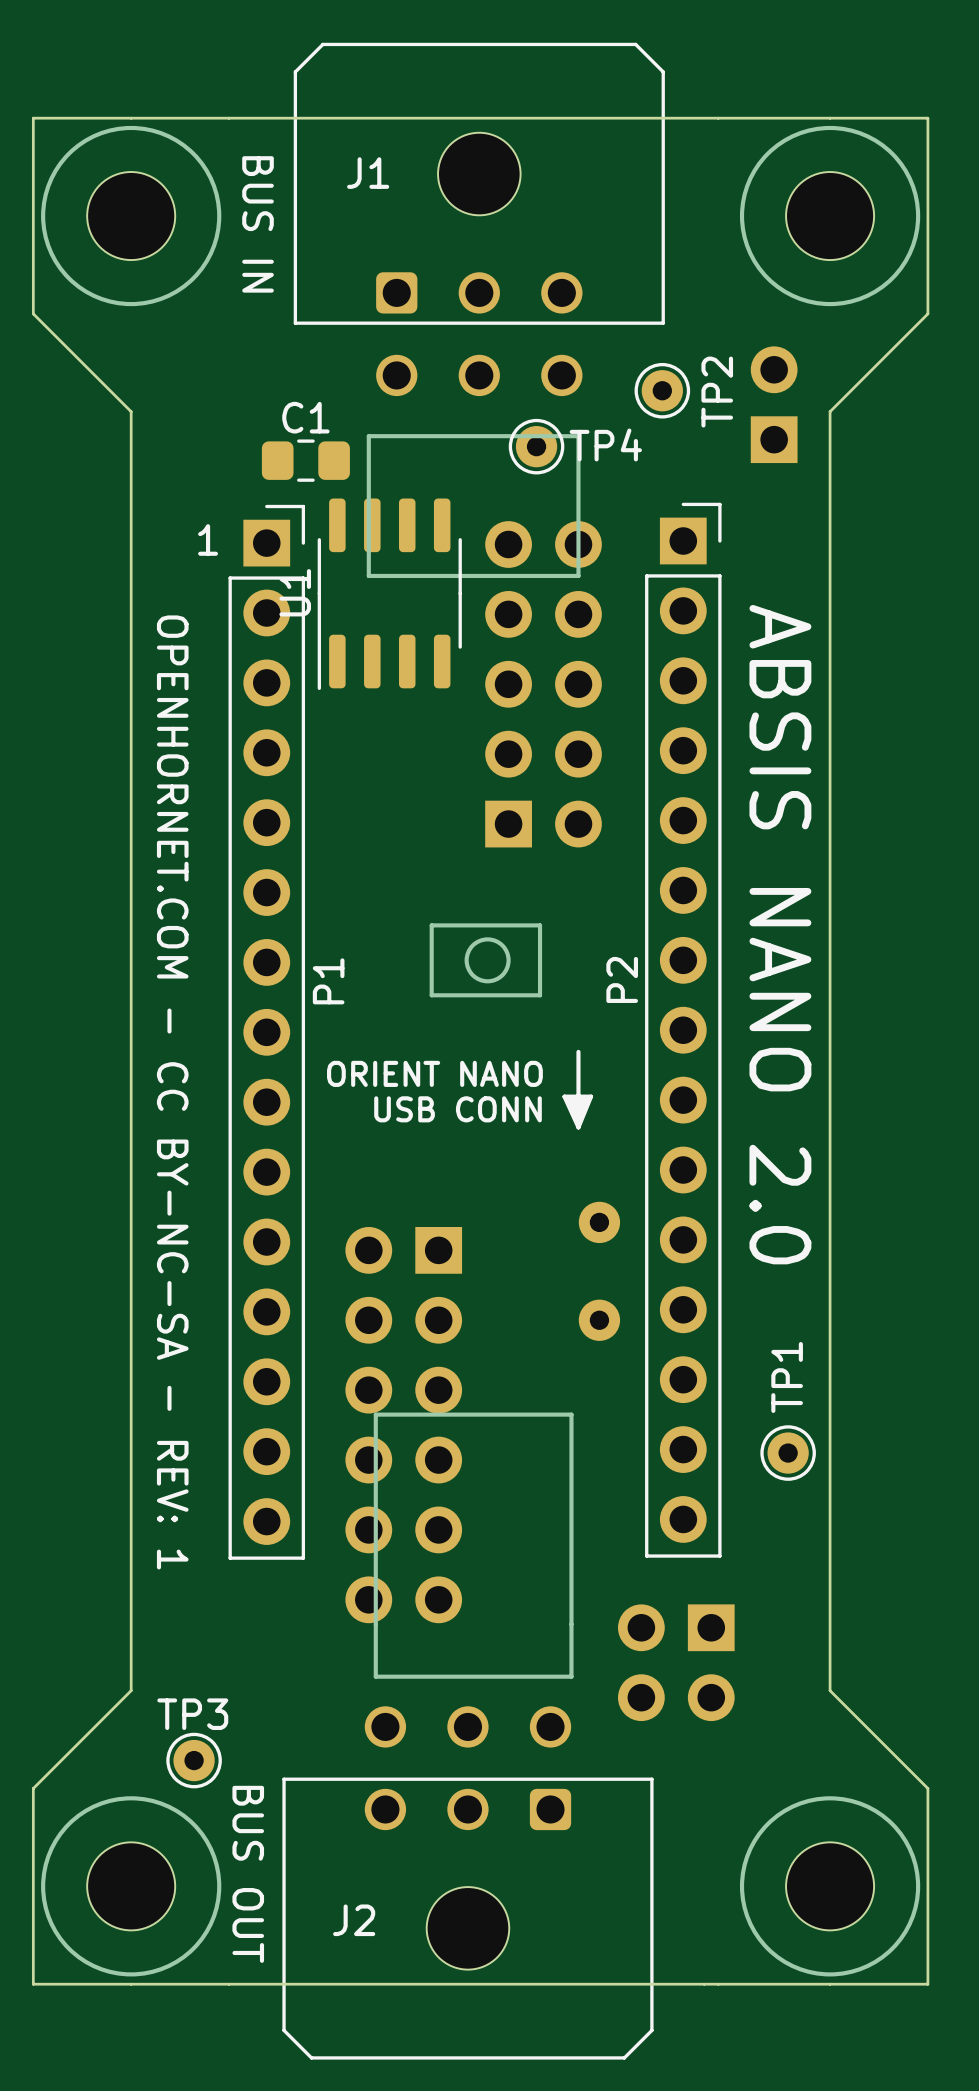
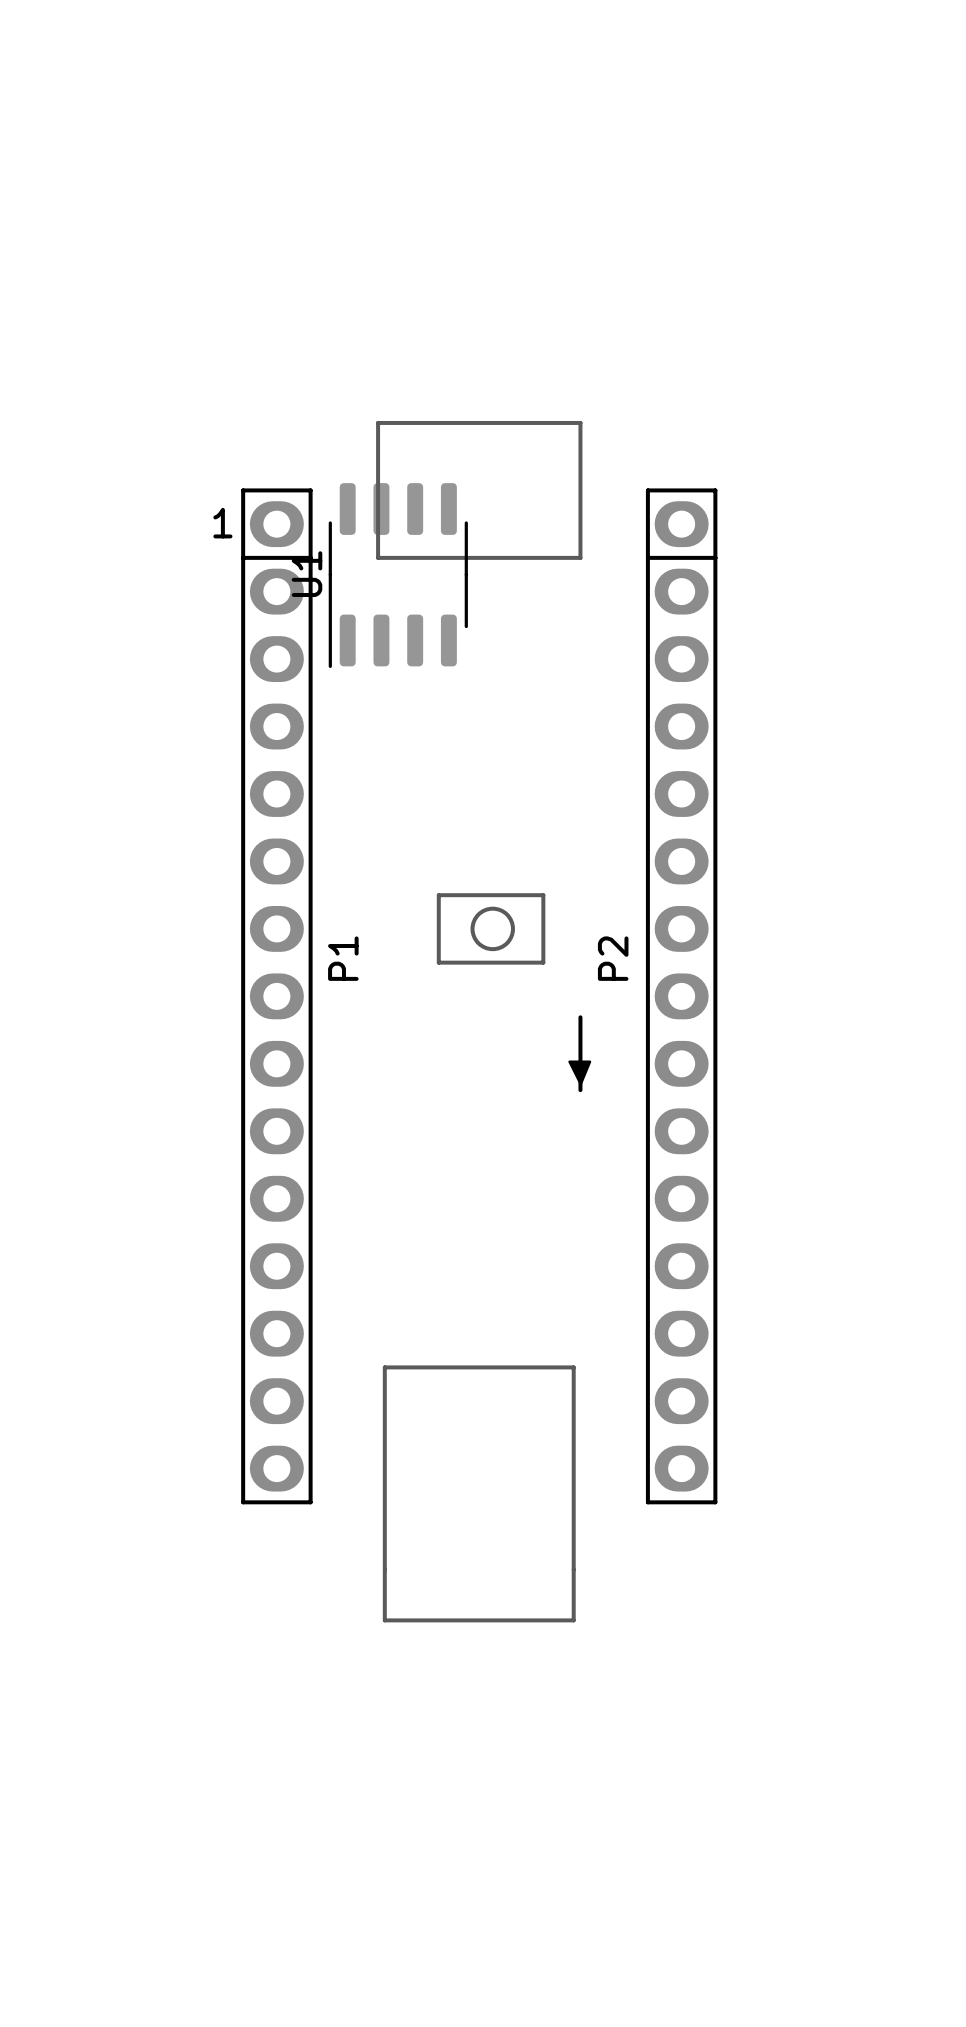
board edge: (33, 118) (927, 118) (927, 313) (830, 411) (830, 1690) (927, 1788) (927, 1984) (33, 1984) (33, 1788) (131, 1690) (131, 411) (33, 313) (33, 118) -> none
part: (131, 216) -> none
part: (830, 216) -> none
J1: (479, 219) -> none
text: BUS IN (258, 224) -> none
TP2: (662, 390) -> none
part: (774, 404) -> none
TP4: (536, 446) -> none
C1: (305, 460) -> none
P2 footprint: [645, 502, 722, 1558] -> [645, 488, 718, 1505]
P1 footprint: [228, 504, 306, 1560] -> [241, 488, 313, 1505]
part: (543, 684) -> none
text: ABSIS NANO 2.0 (780, 934) -> none
text: ORIENT NANO (434, 1073) -> none
text: OPENHORNET.COM - CC BY-NC-SA - REV: 1 (172, 1092) -> none
line: (564, 1096) (578, 1127) (591, 1096) (564, 1096) -> none
text: USB CONN (458, 1109) -> none
part: (599, 1222) -> none
part: (599, 1320) -> none
part: (403, 1425) -> none
TP1: (788, 1453) -> none
part: (676, 1662) -> none
TP3: (194, 1760) -> none
text: BUS OUT (248, 1874) -> none
J2: (467, 1882) -> none
part: (131, 1886) -> none
part: (830, 1886) -> none

